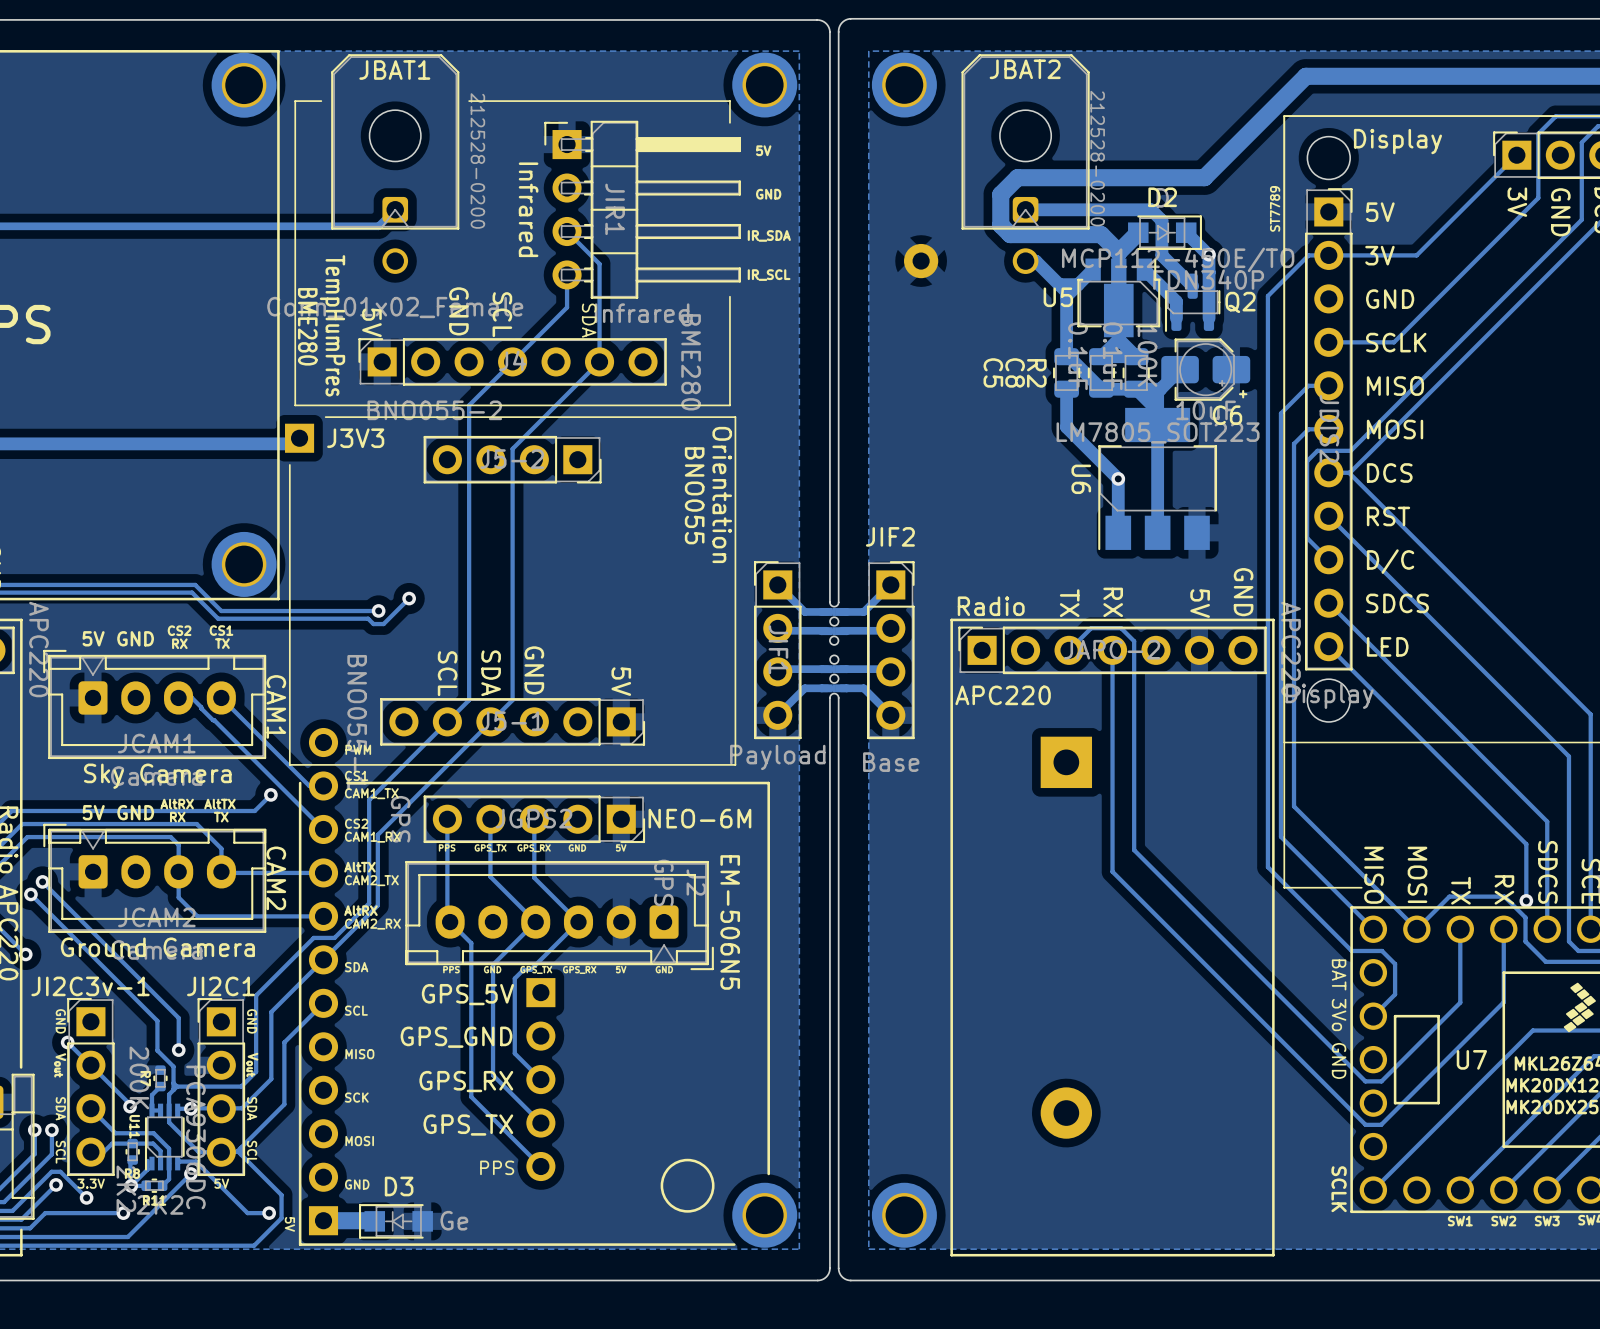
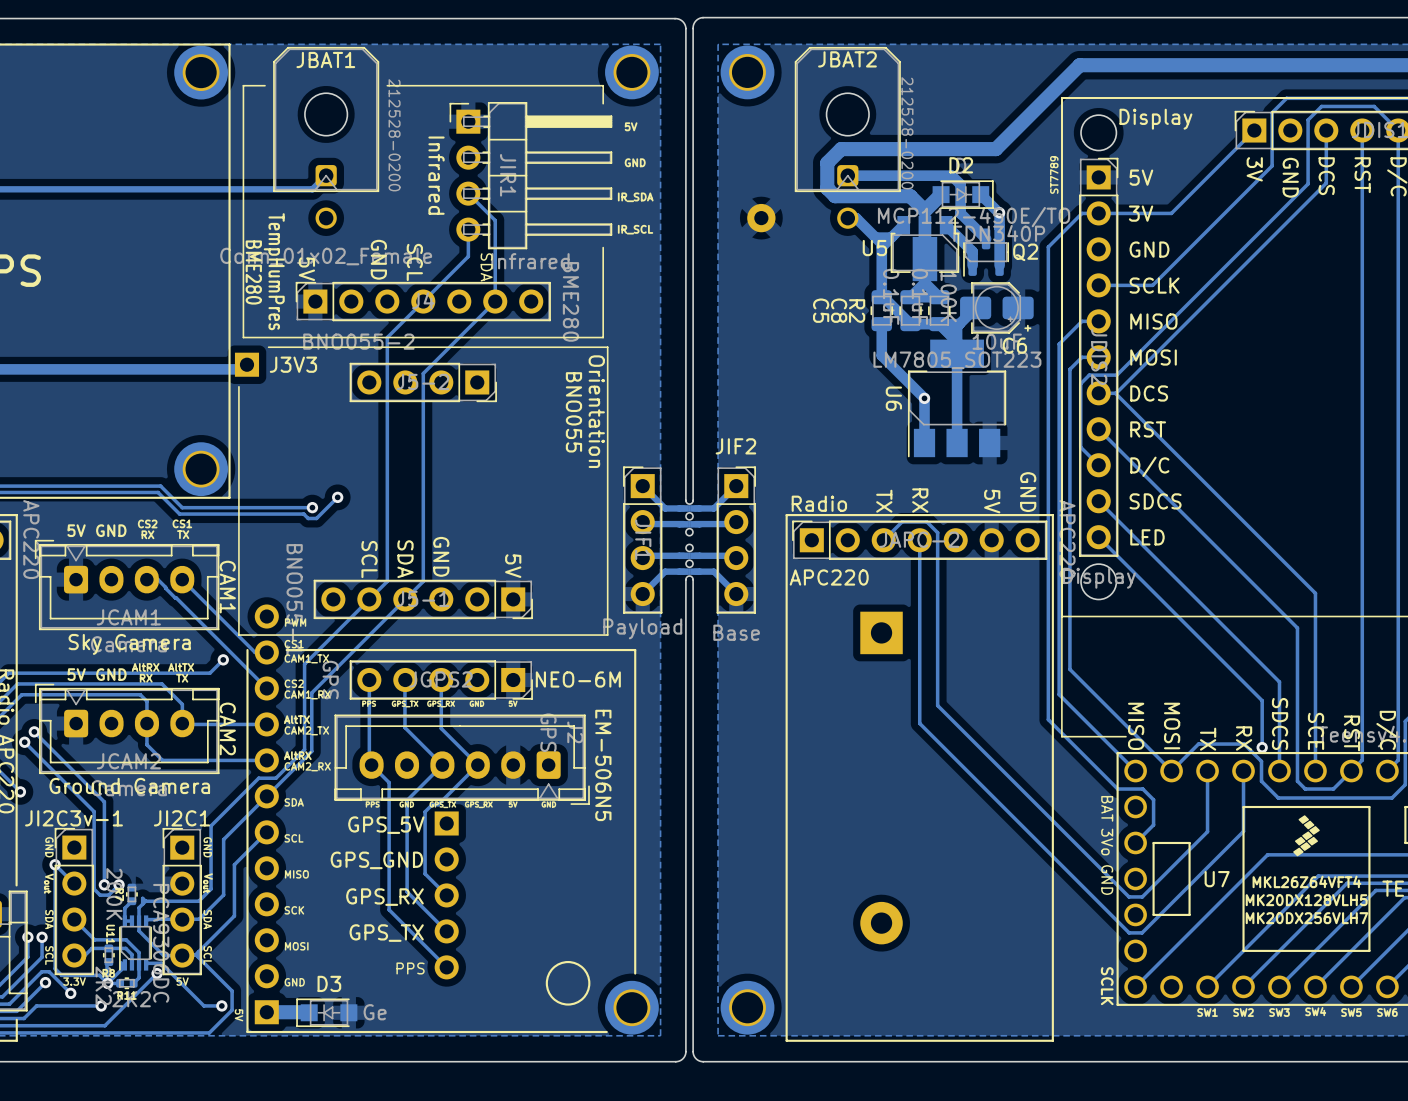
track: (127, 966) (178, 1018) (178, 1050) -> (104, 801) (104, 884)
track: (114, 978) (157, 1020) (157, 1050) (173, 1066) (173, 1083) -> (94, 811) (94, 889) (100, 895) (108, 895) (119, 884)
track: none -> (55, 864) (55, 968) (61, 975) (99, 975) (107, 982)
via: (178, 1050) -> none
track: (90, 1065) (130, 1104) (130, 1106) -> none
via: none -> (104, 884)
via: none -> (119, 884)
via: (130, 1106) -> none
via: (190, 1108) -> none

